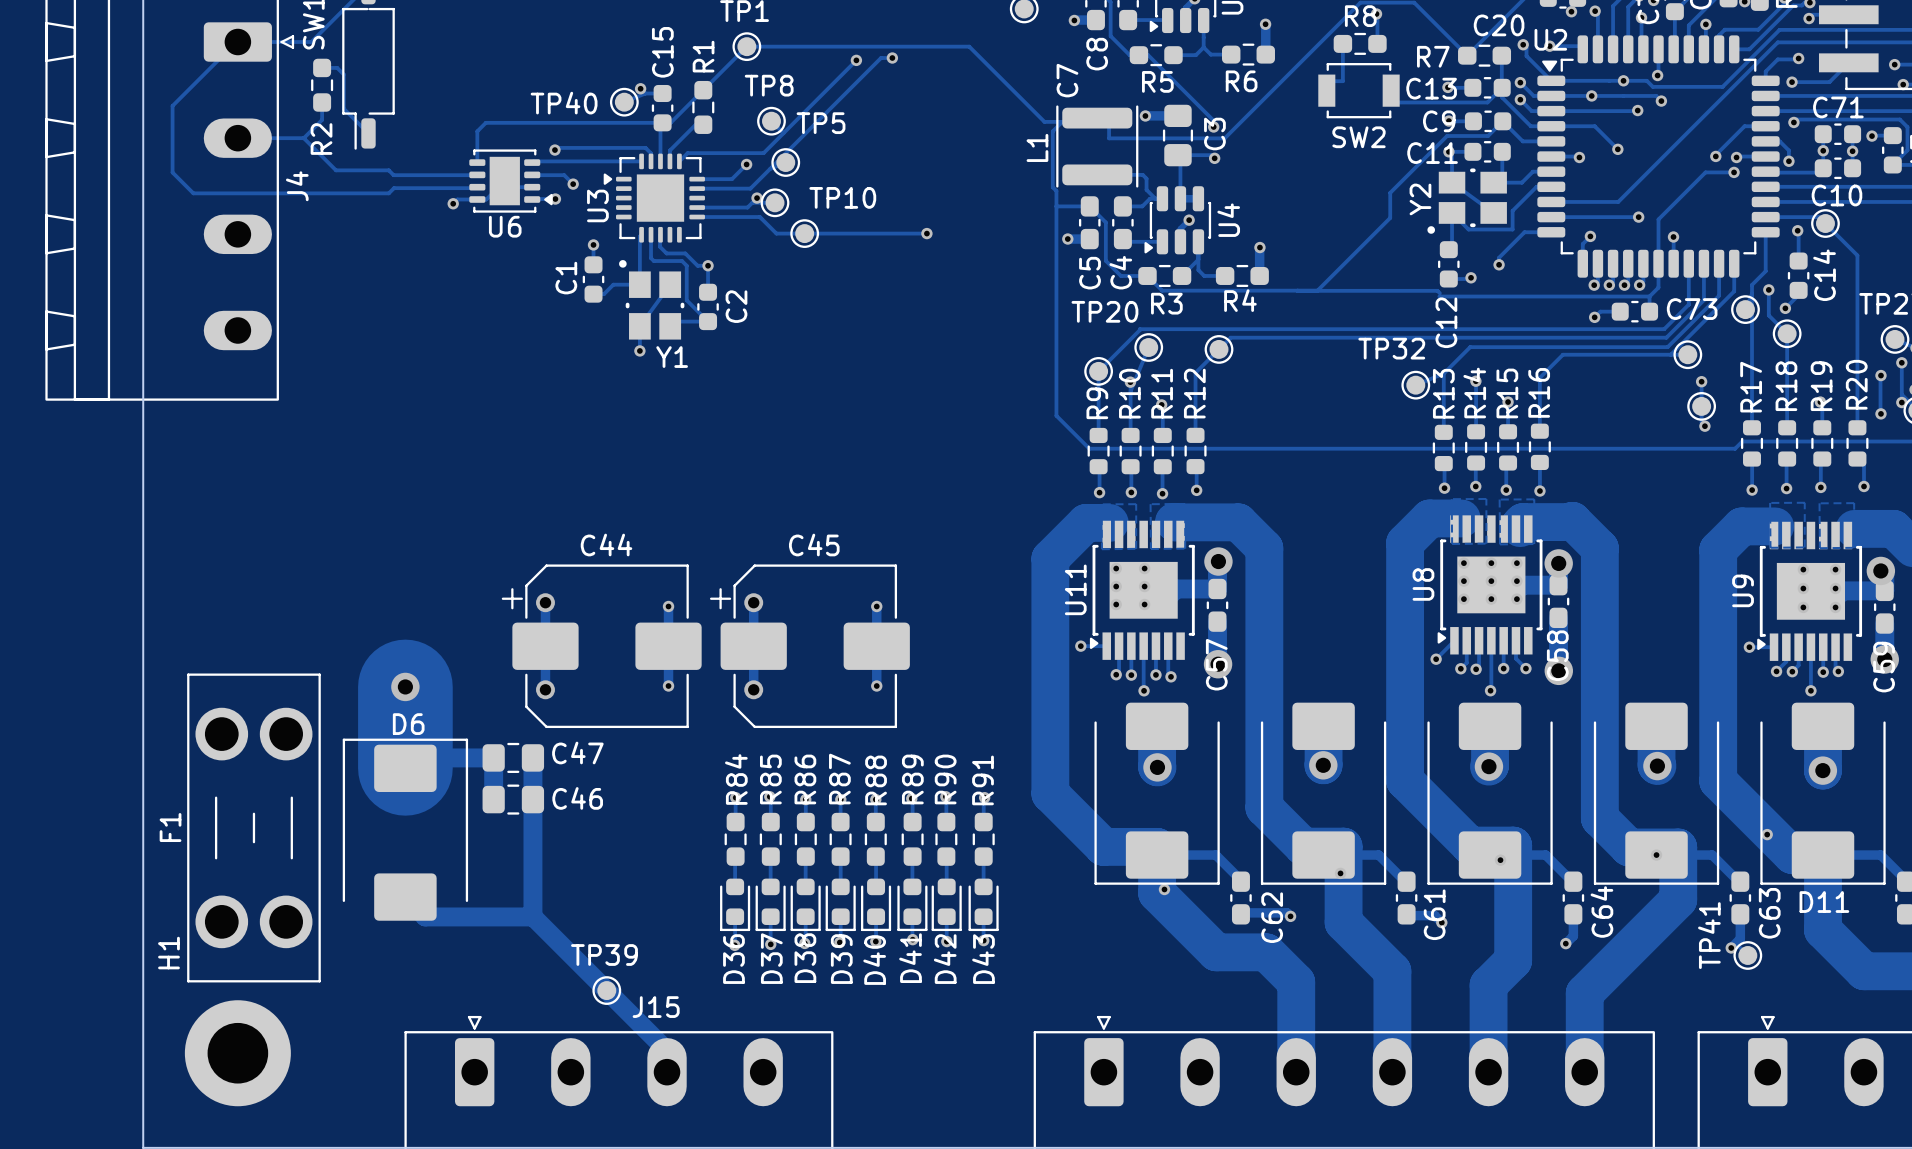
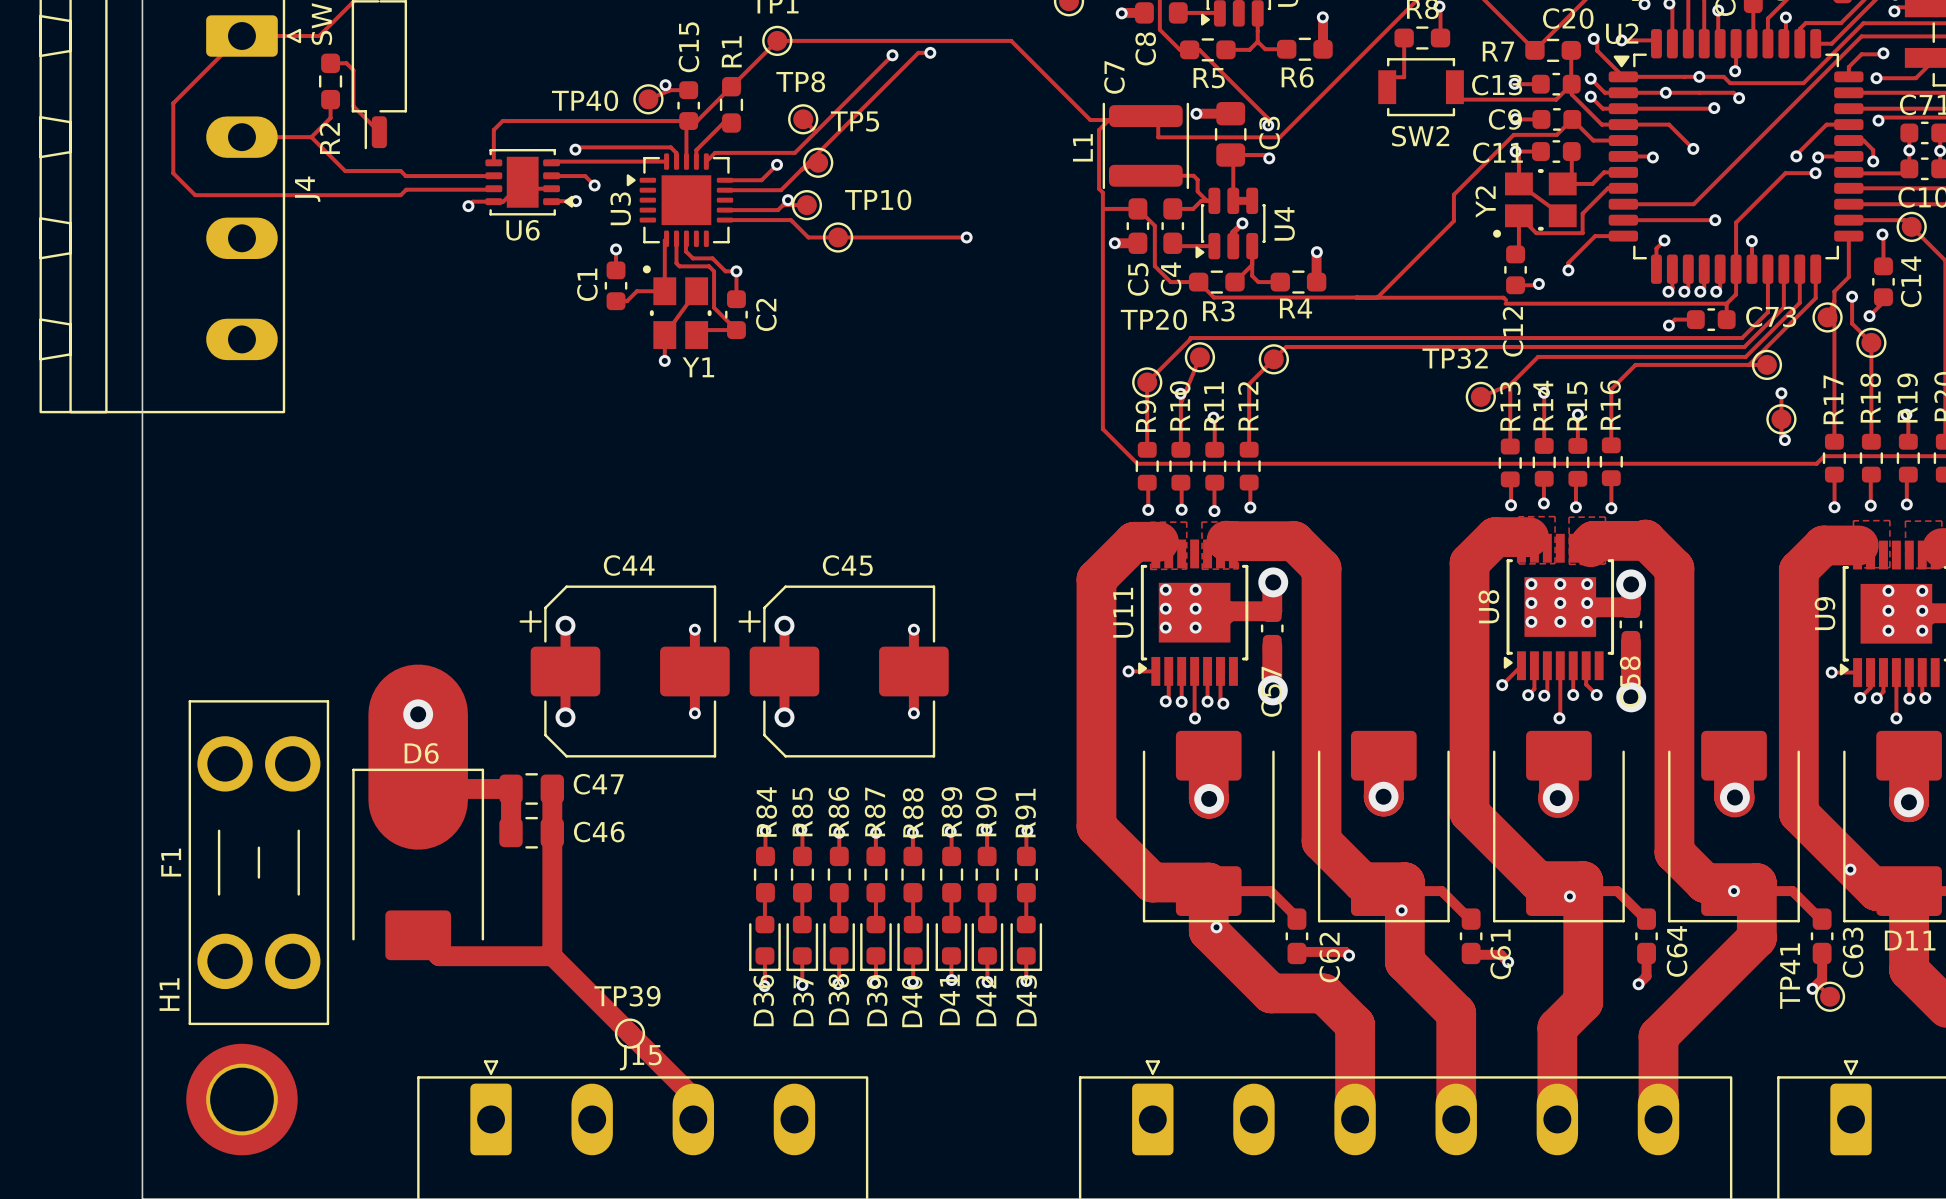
J15 name position: J15 (656, 1007) -> J15 (640, 1057)

